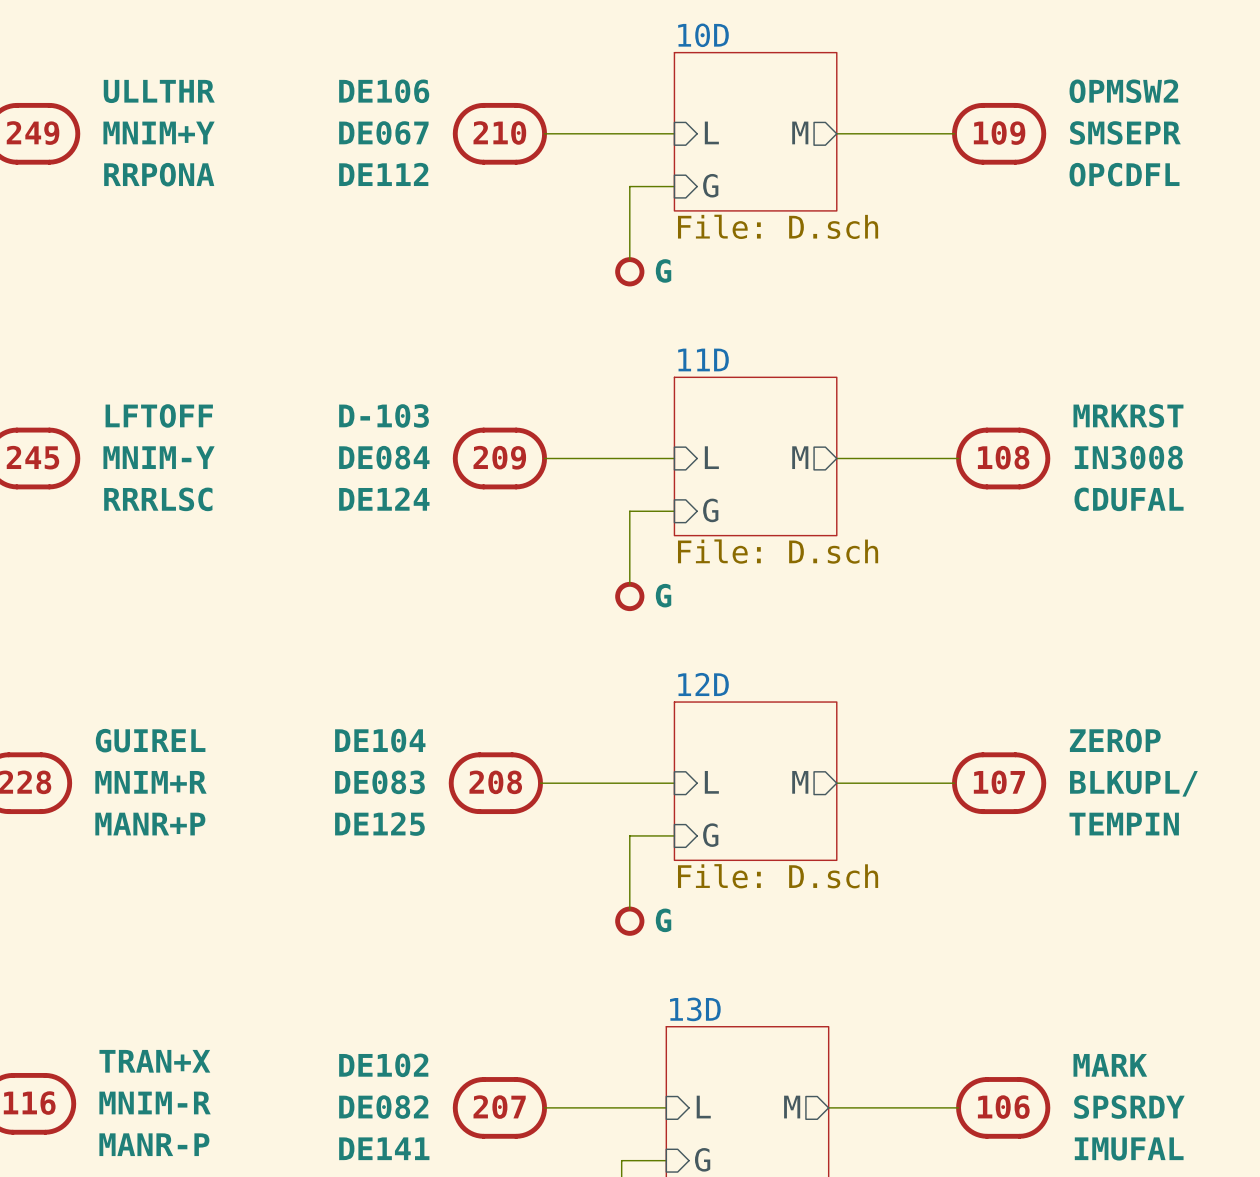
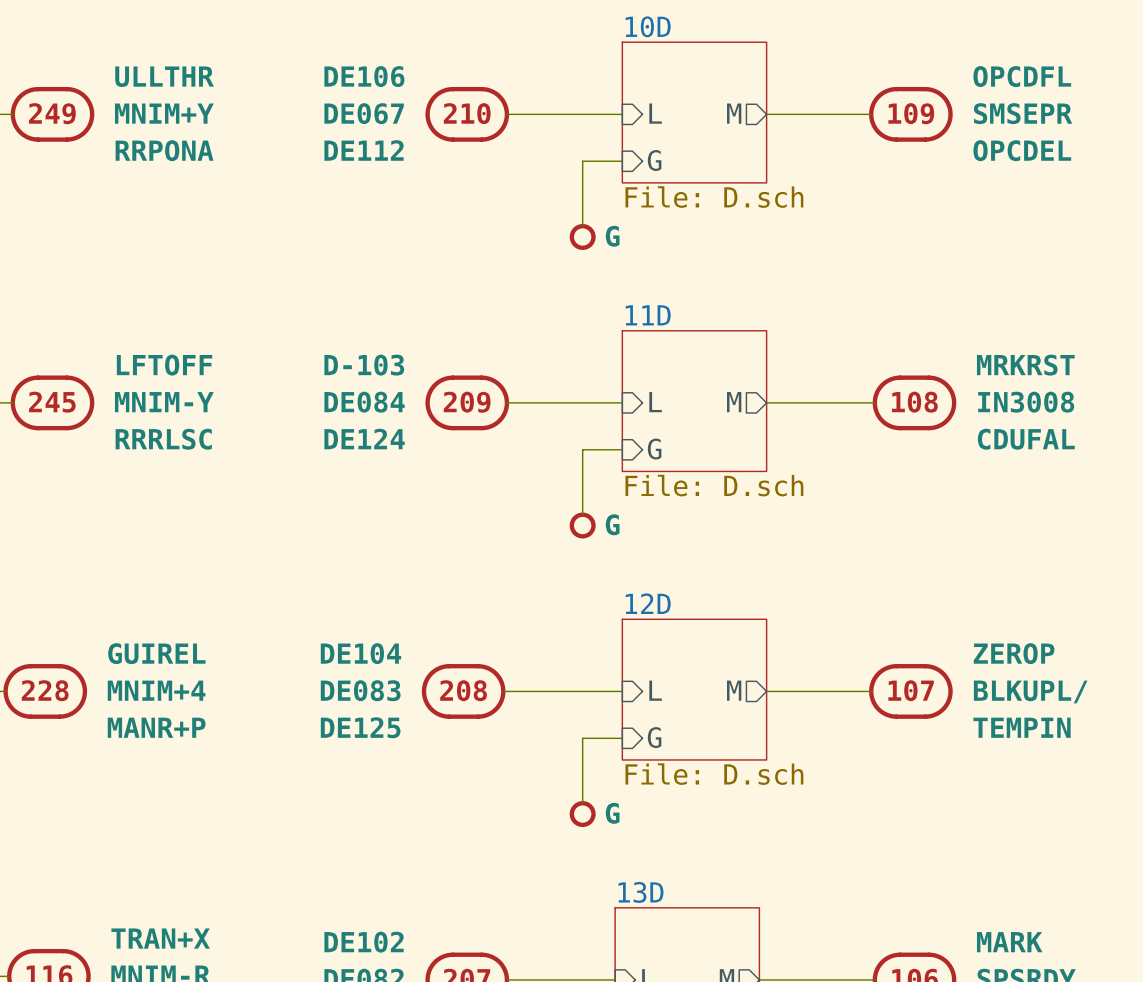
part text: OPMSW2 (1123, 91) -> OPCDFL (1022, 76)
part text: OPCDFL (1124, 174) -> OPCDEL (1022, 150)
part text: MNIM+R (151, 782) -> MNIM+4 (156, 690)

